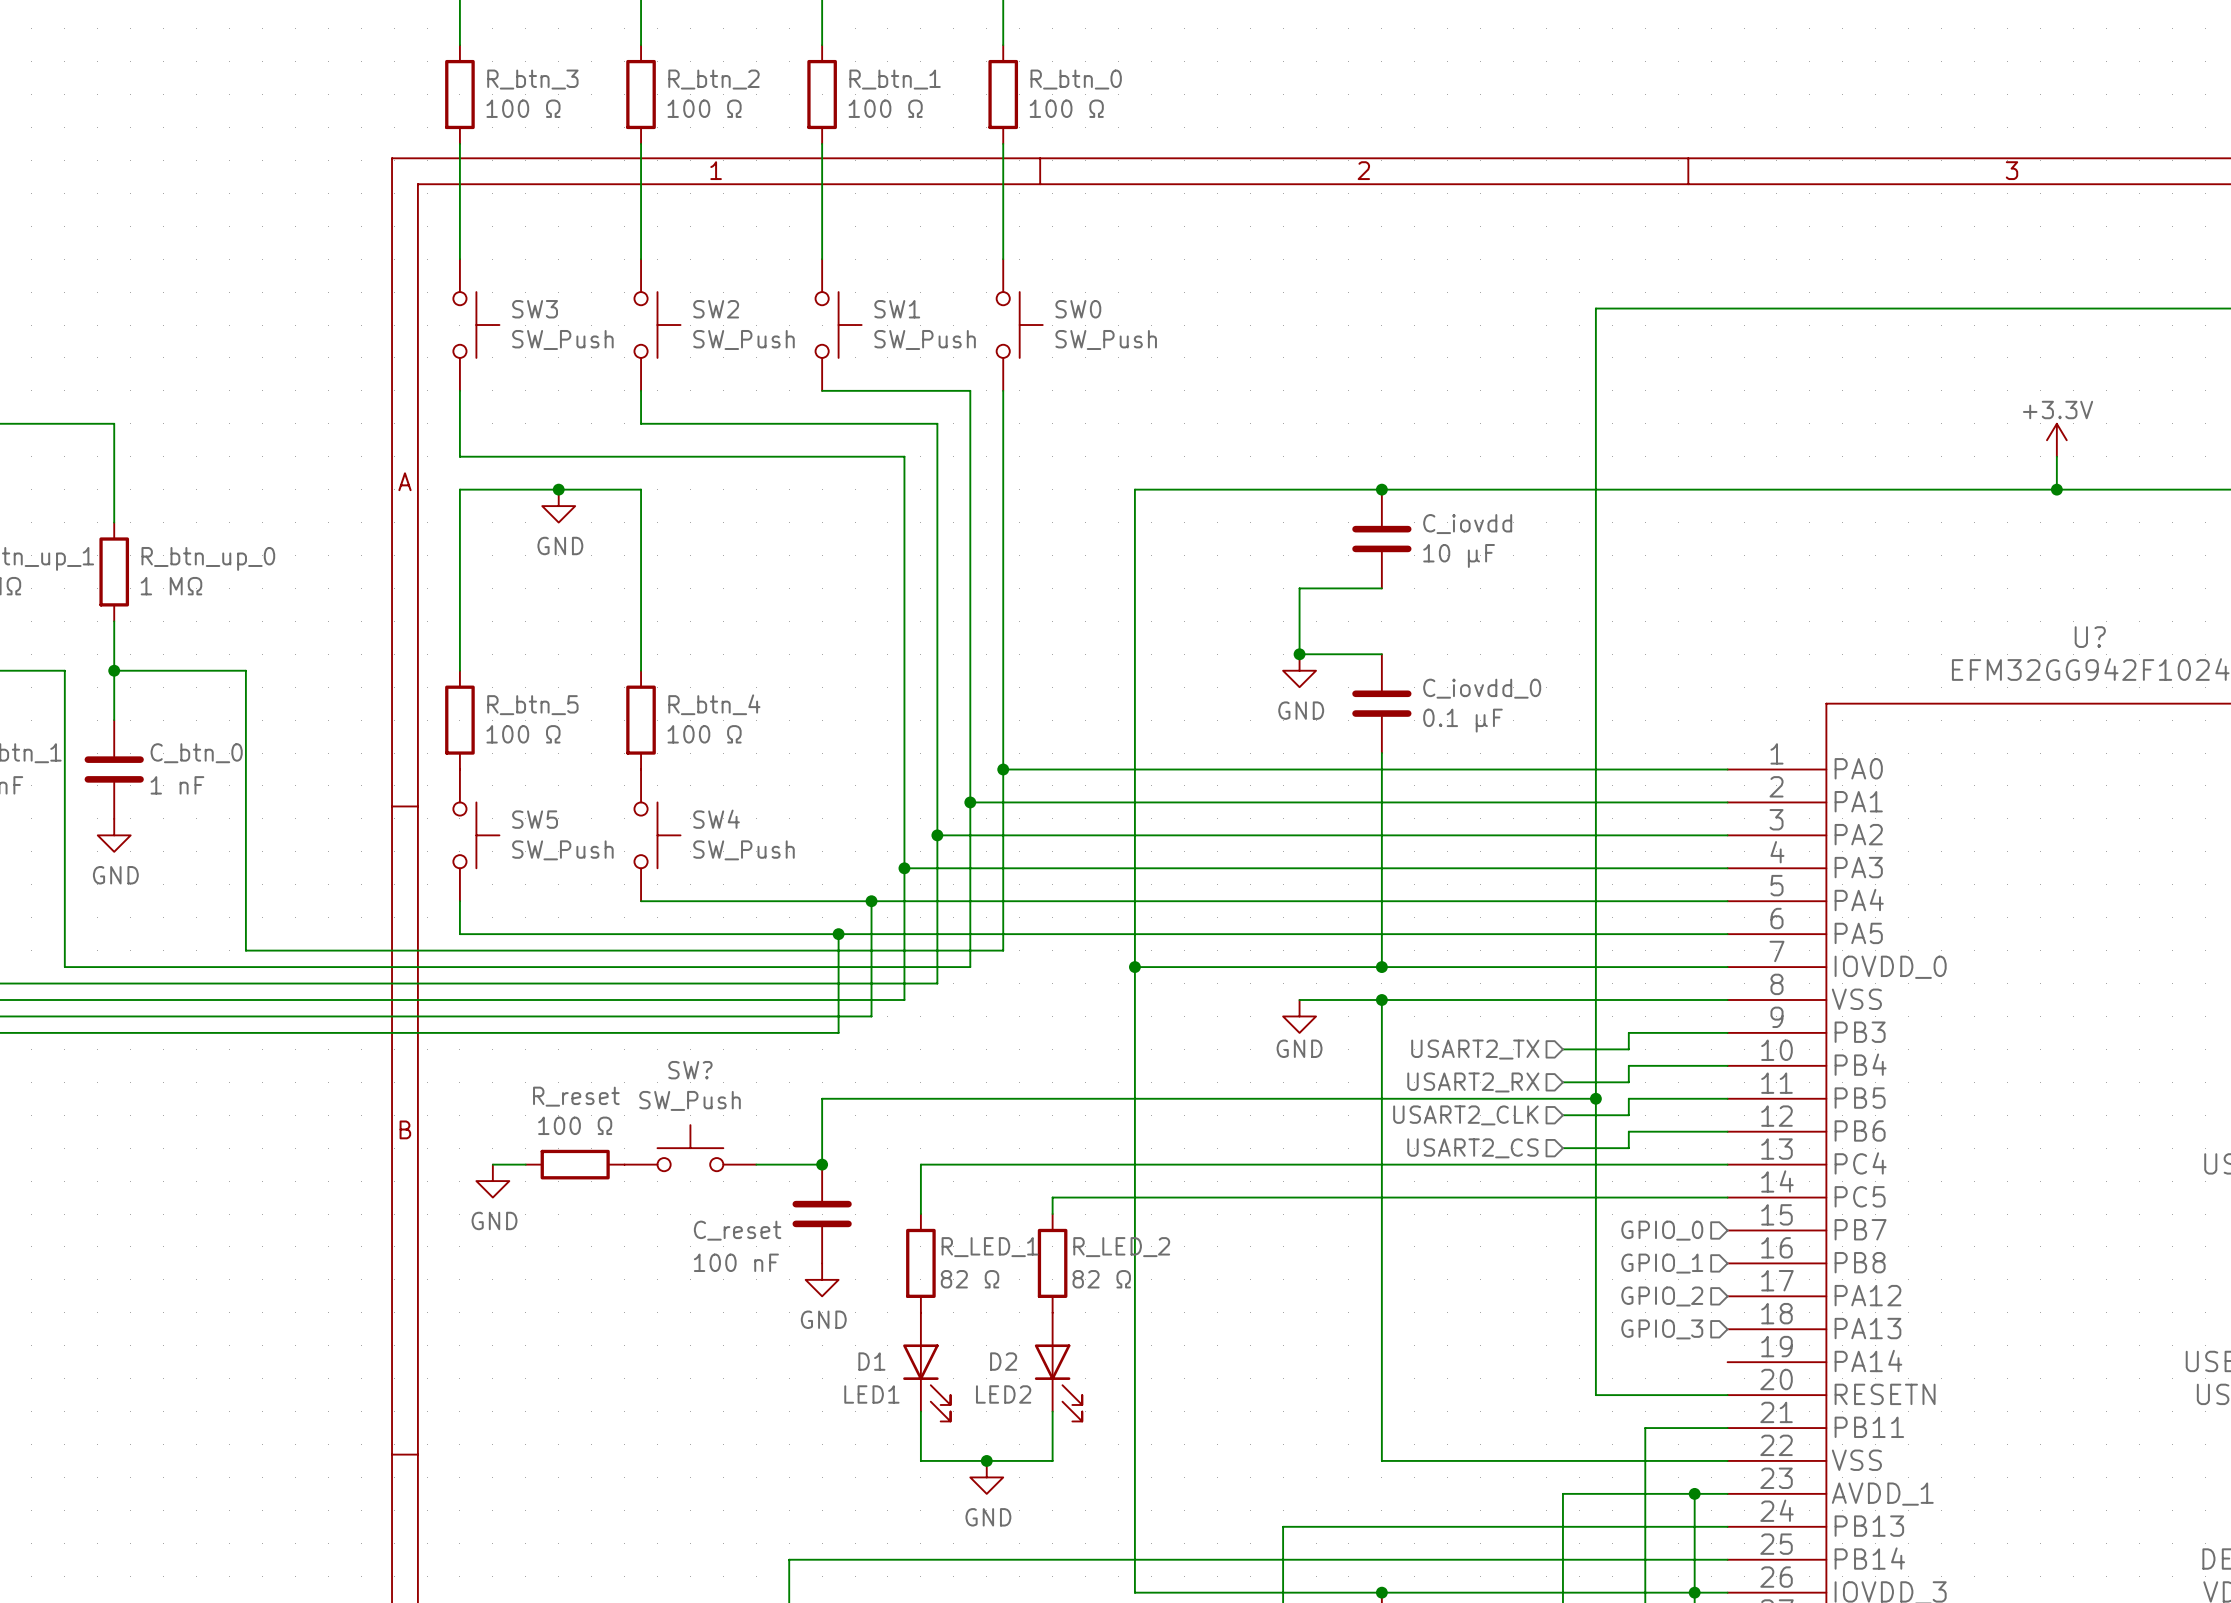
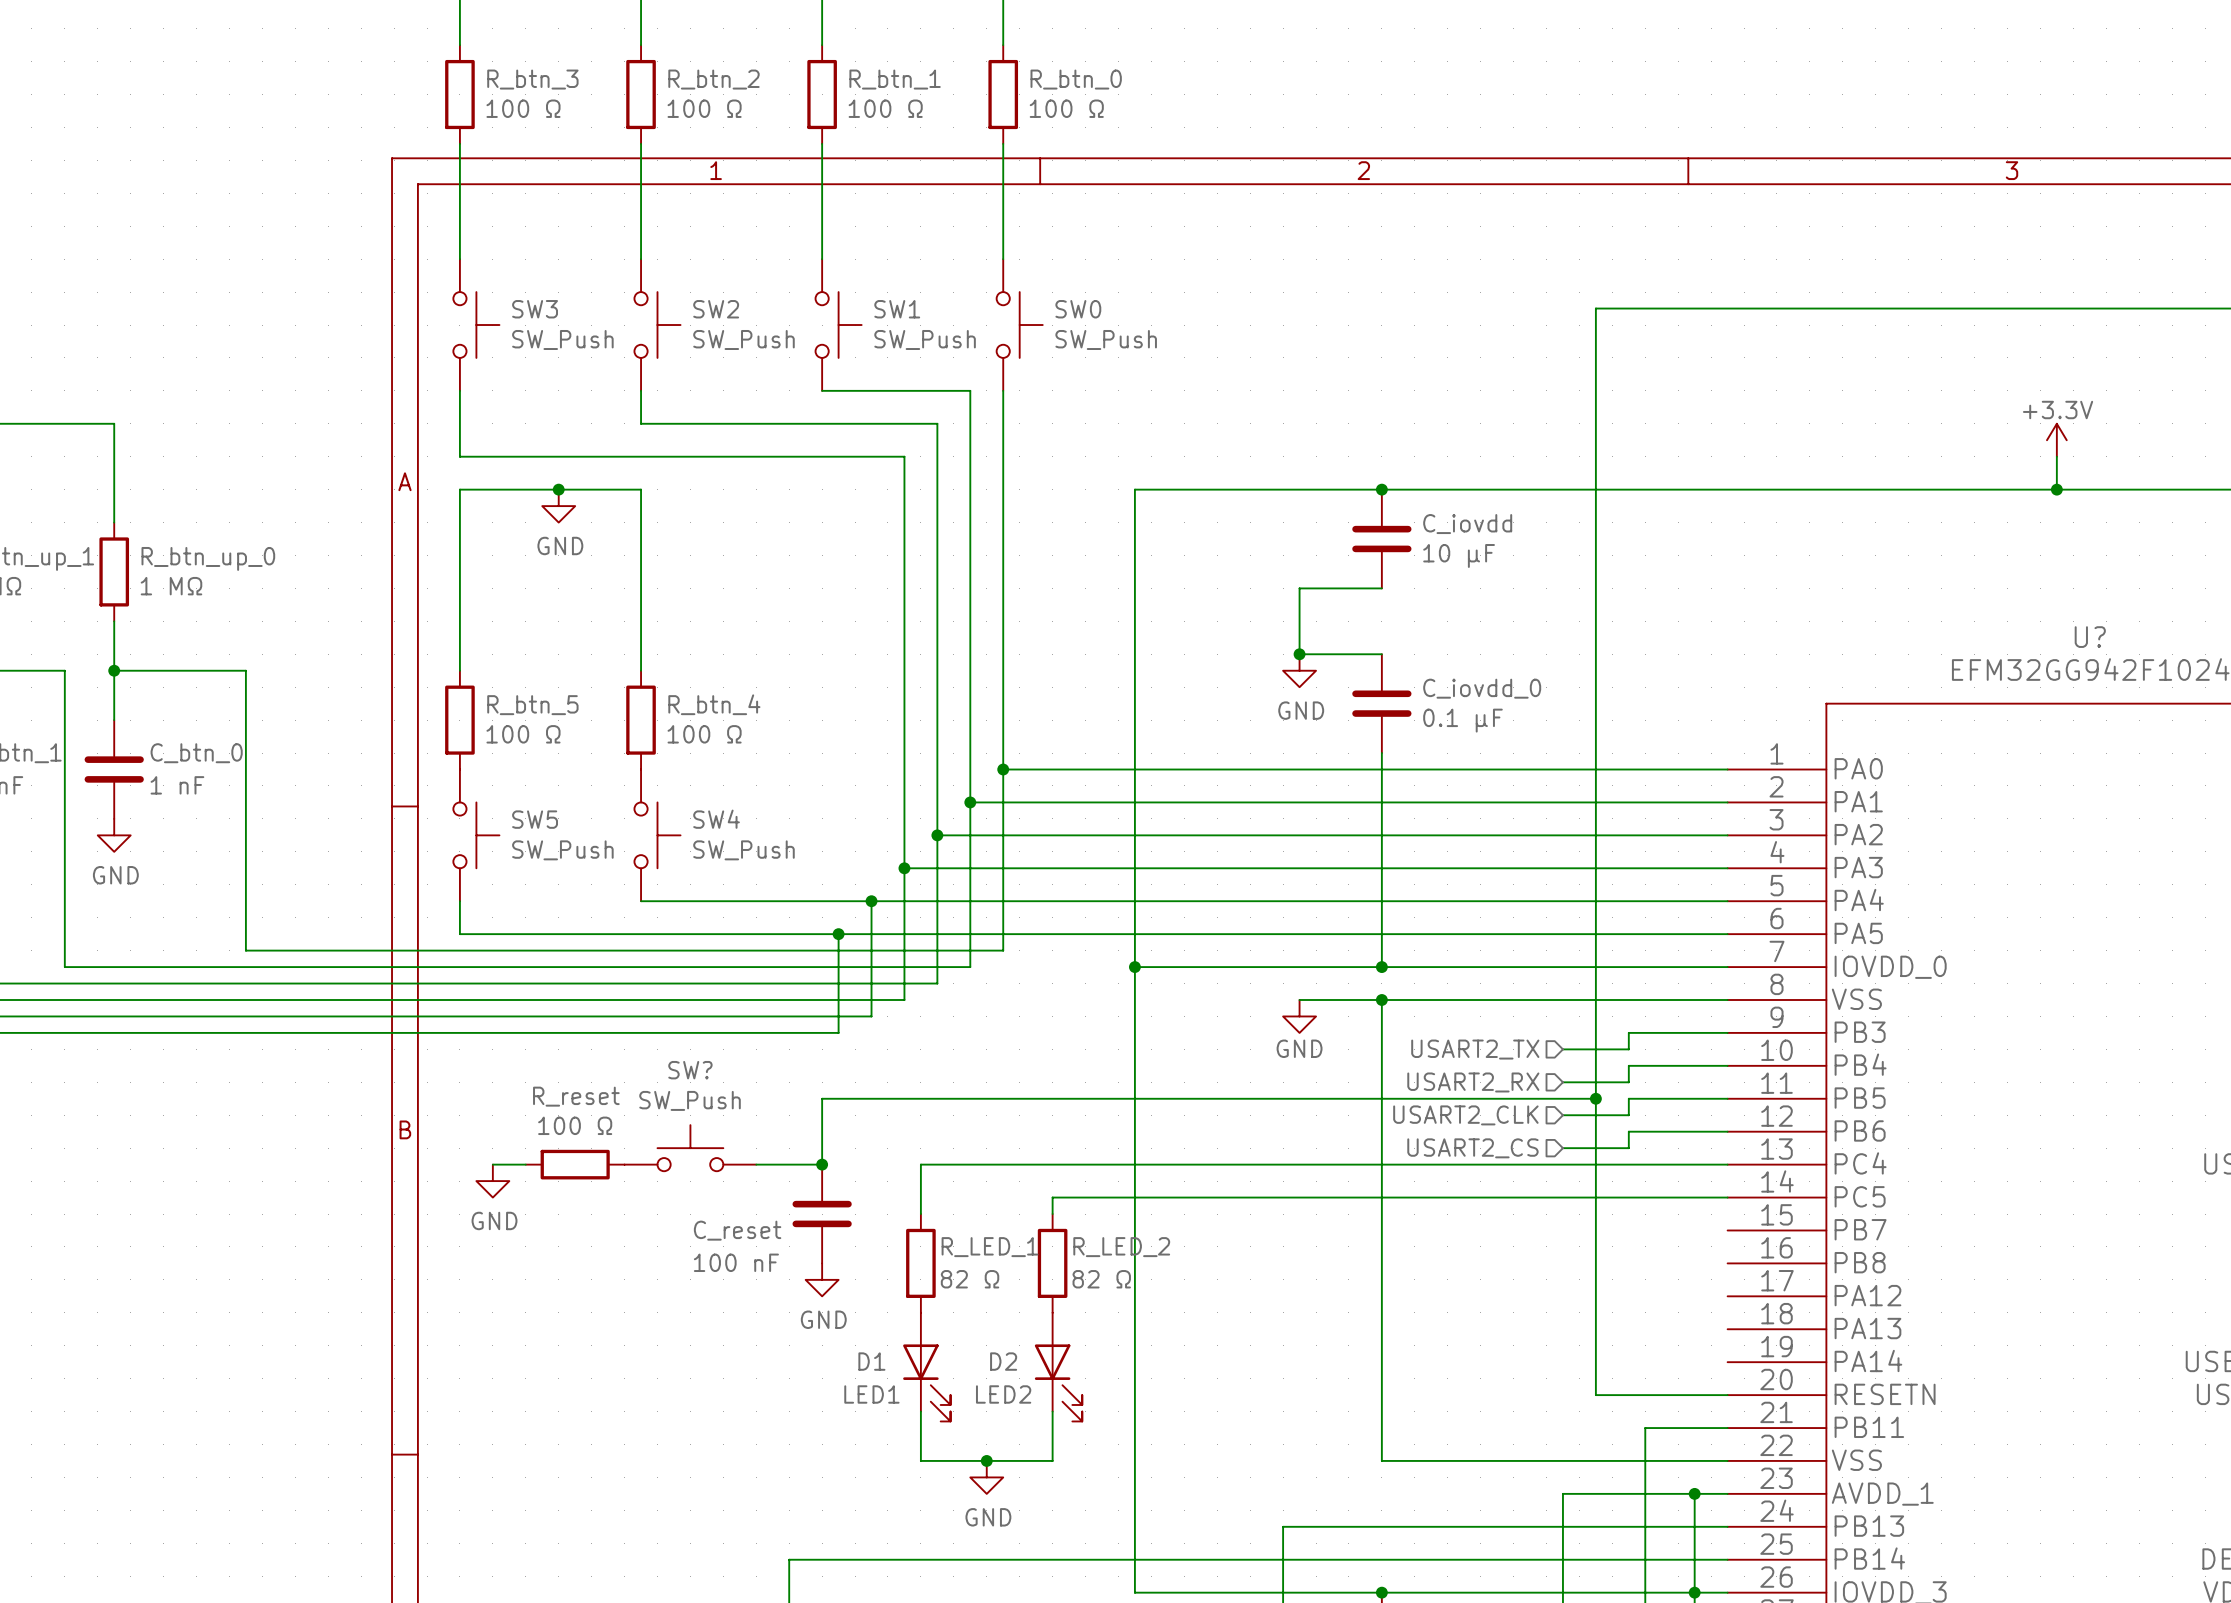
hierarchical label: GPIO_0 (1662, 1230) -> none
hierarchical label: GPIO_1 (1662, 1263) -> none
hierarchical label: GPIO_2 (1662, 1296) -> none
hierarchical label: GPIO_3 (1662, 1329) -> none

